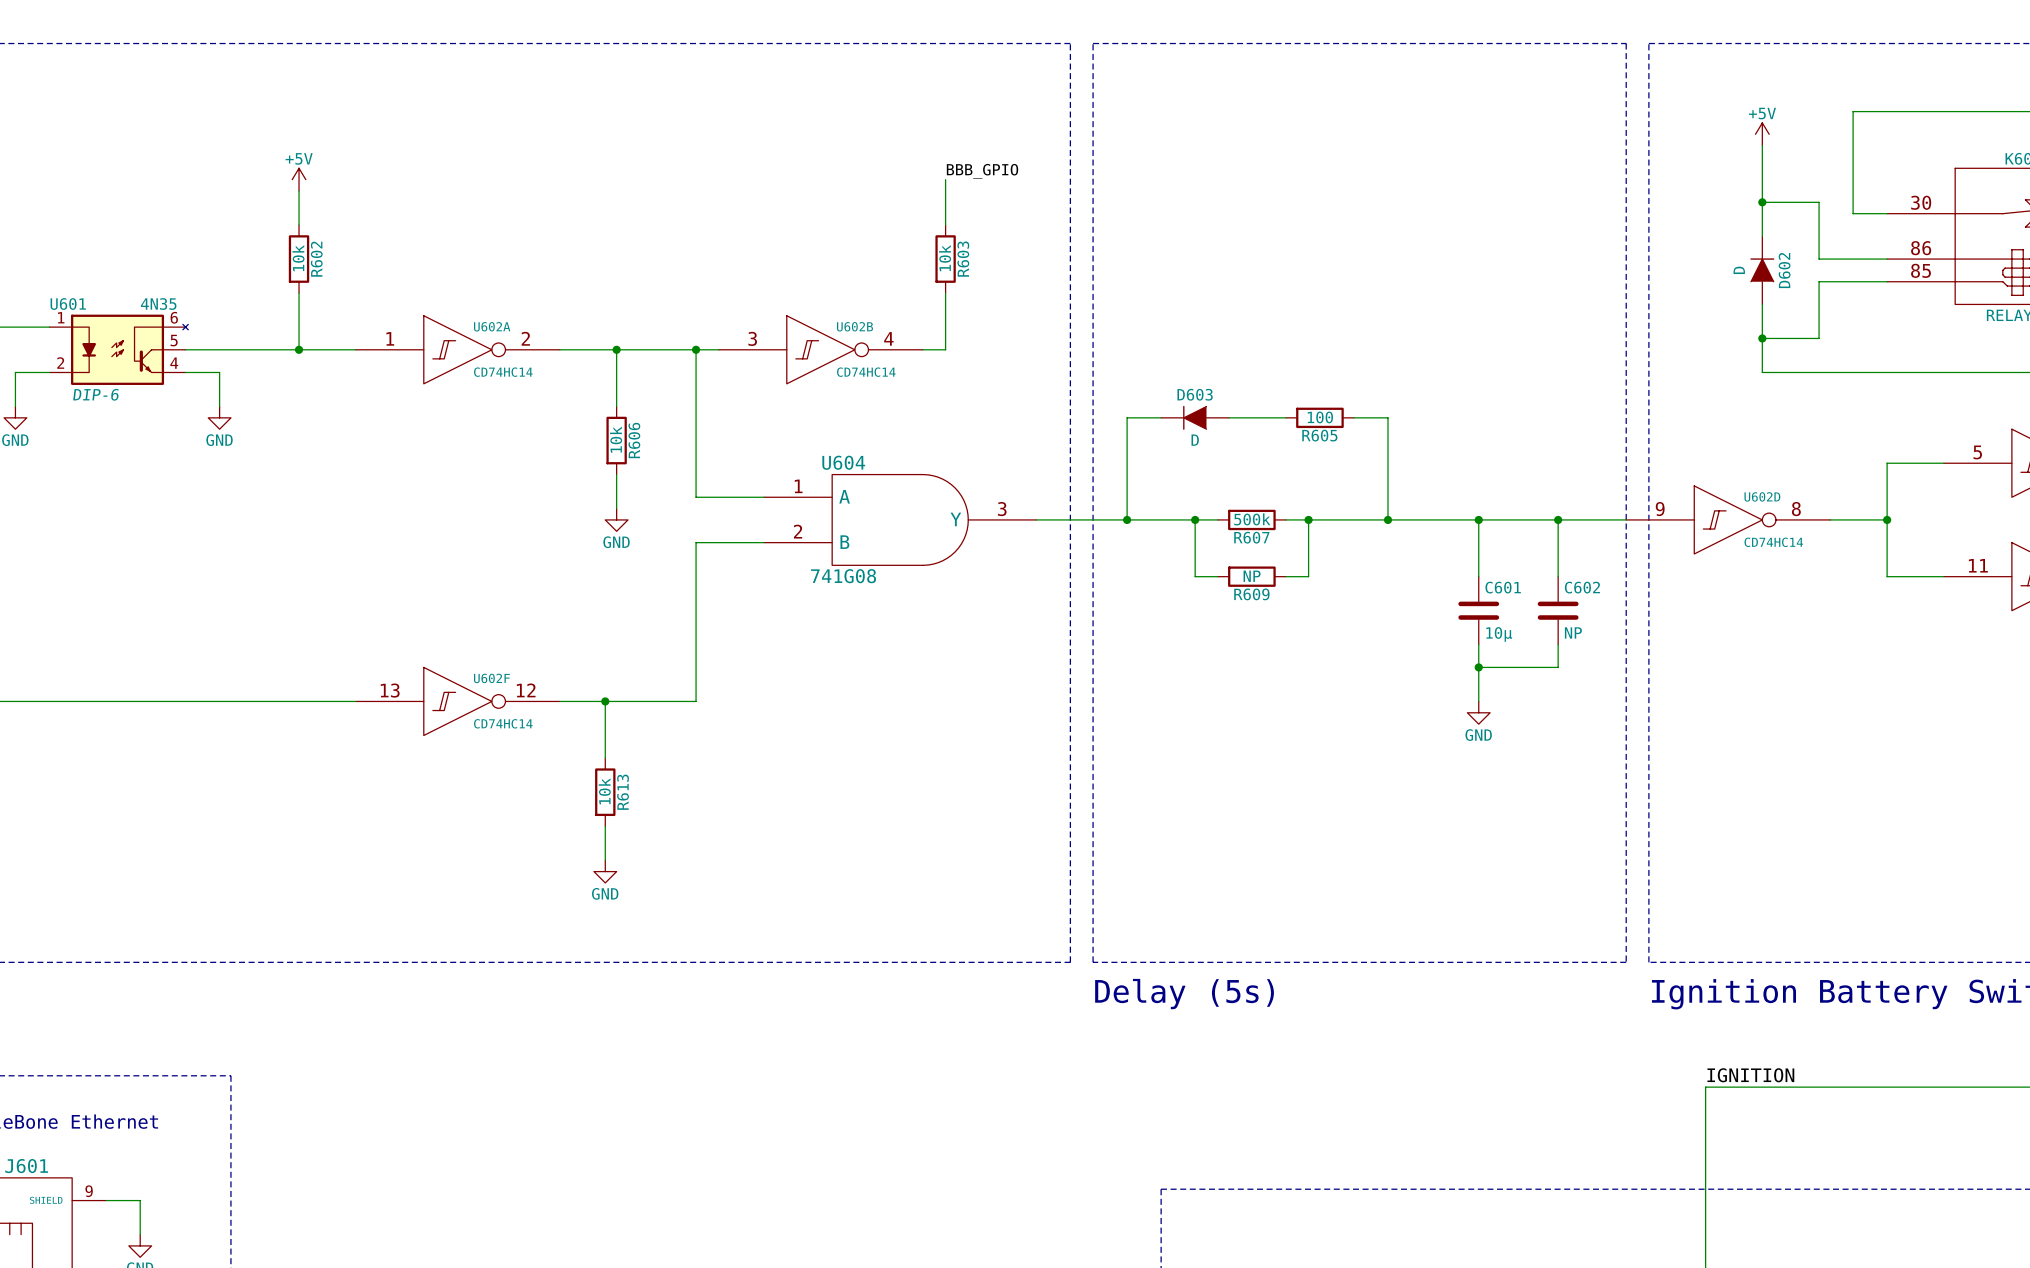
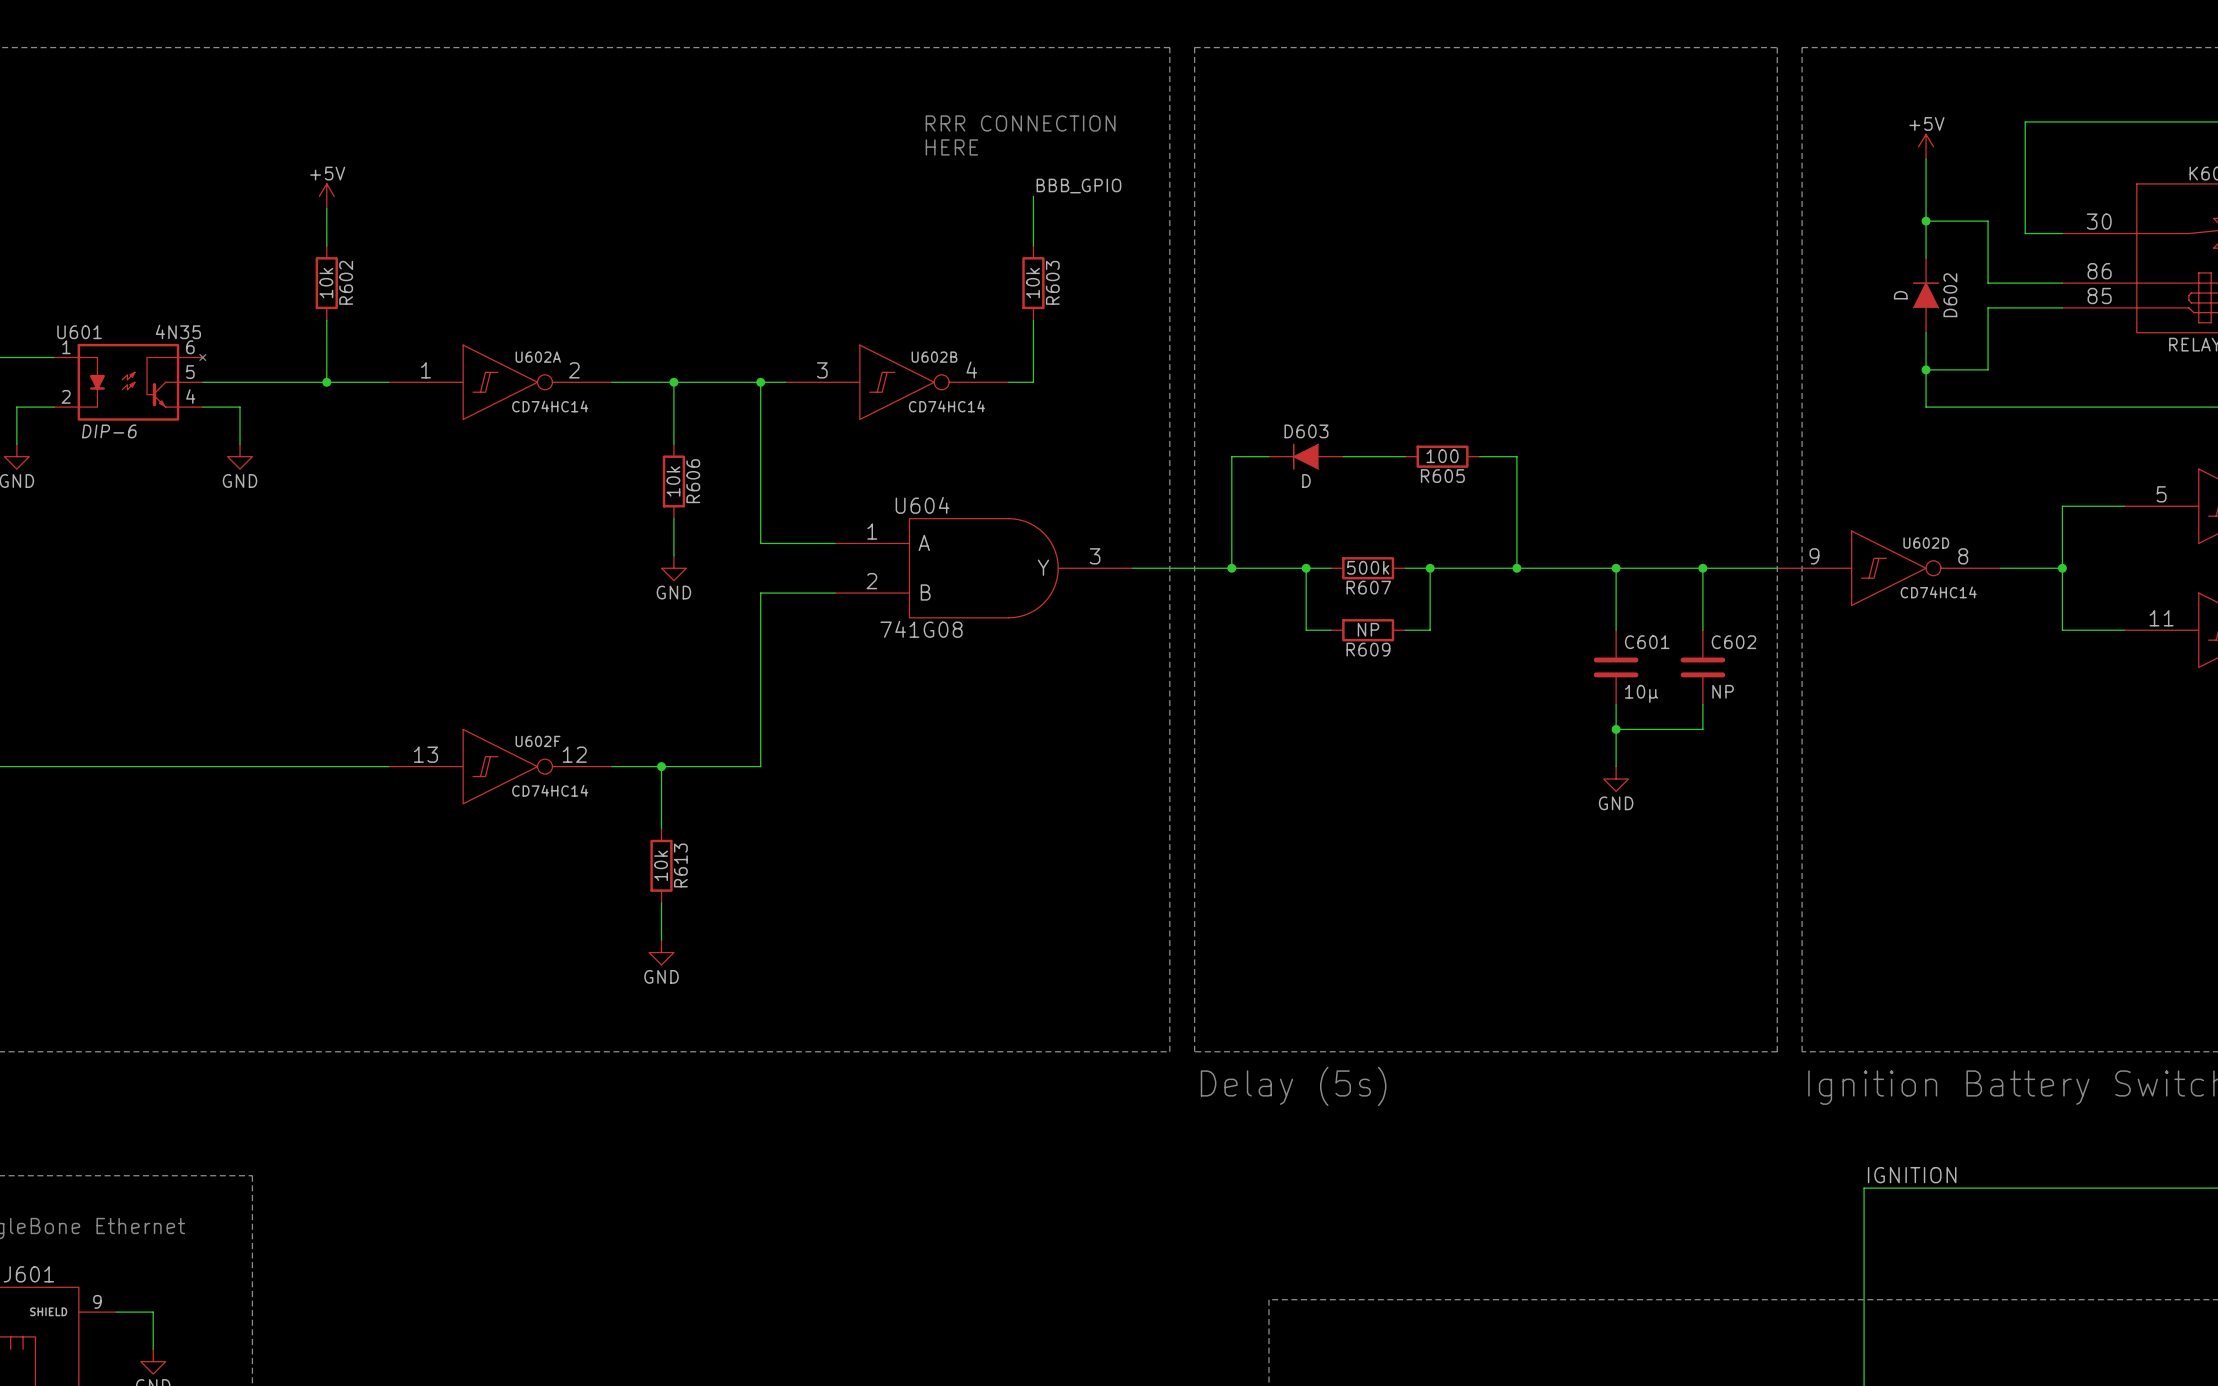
text: none -> RRR CONNECTION (1020, 123)
text: none -> HERE (951, 147)

